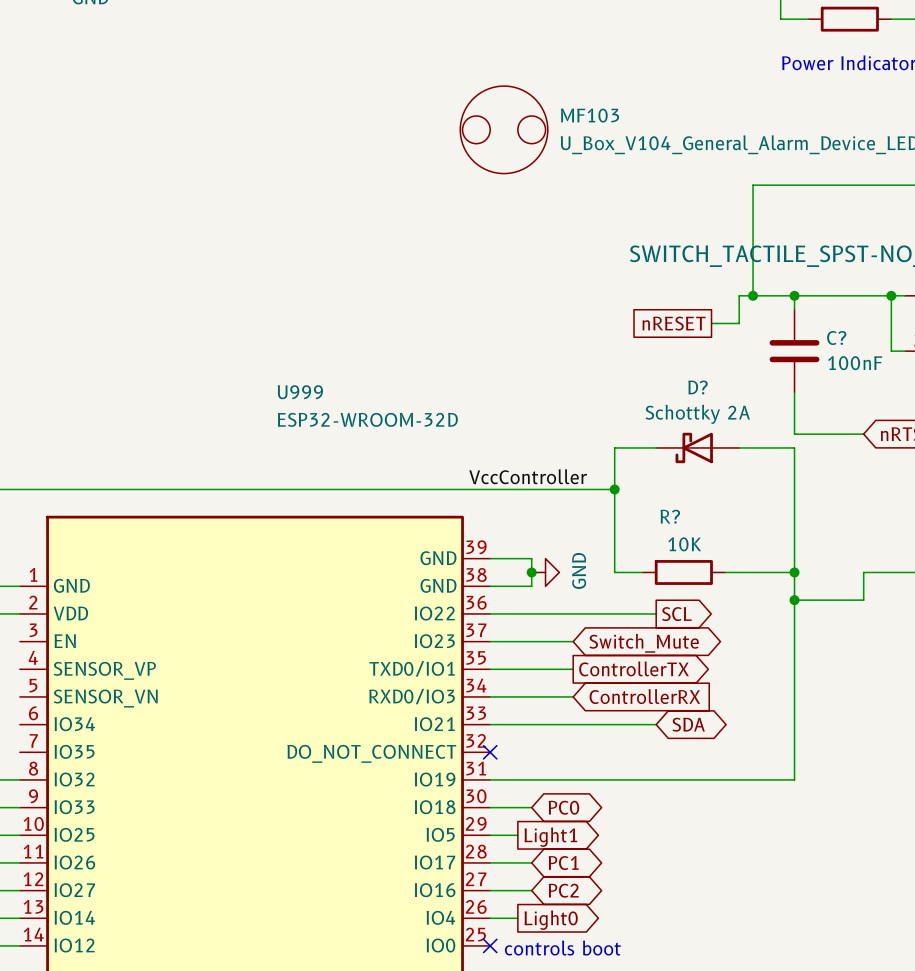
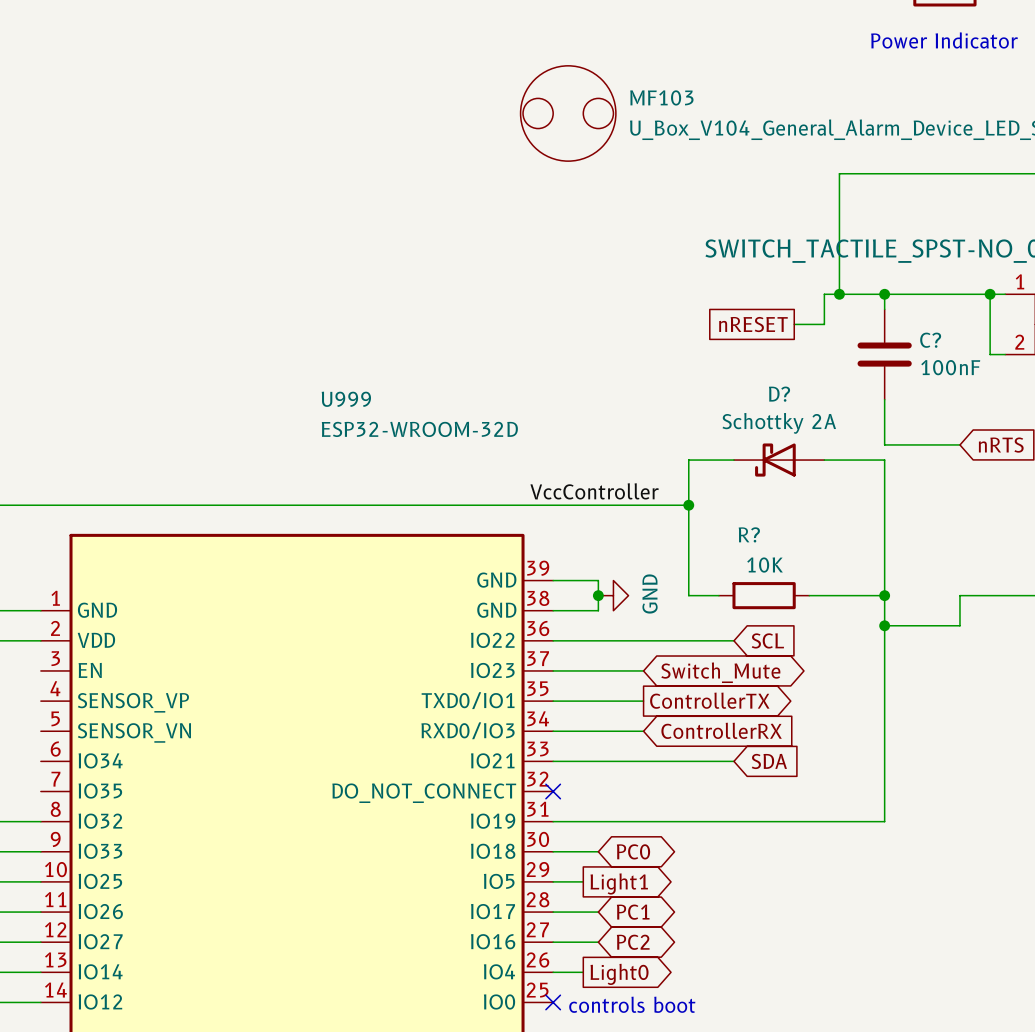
global label shape: output (676, 614) -> input (767, 640)
global label shape: bidirectional (688, 724) -> input (769, 761)

